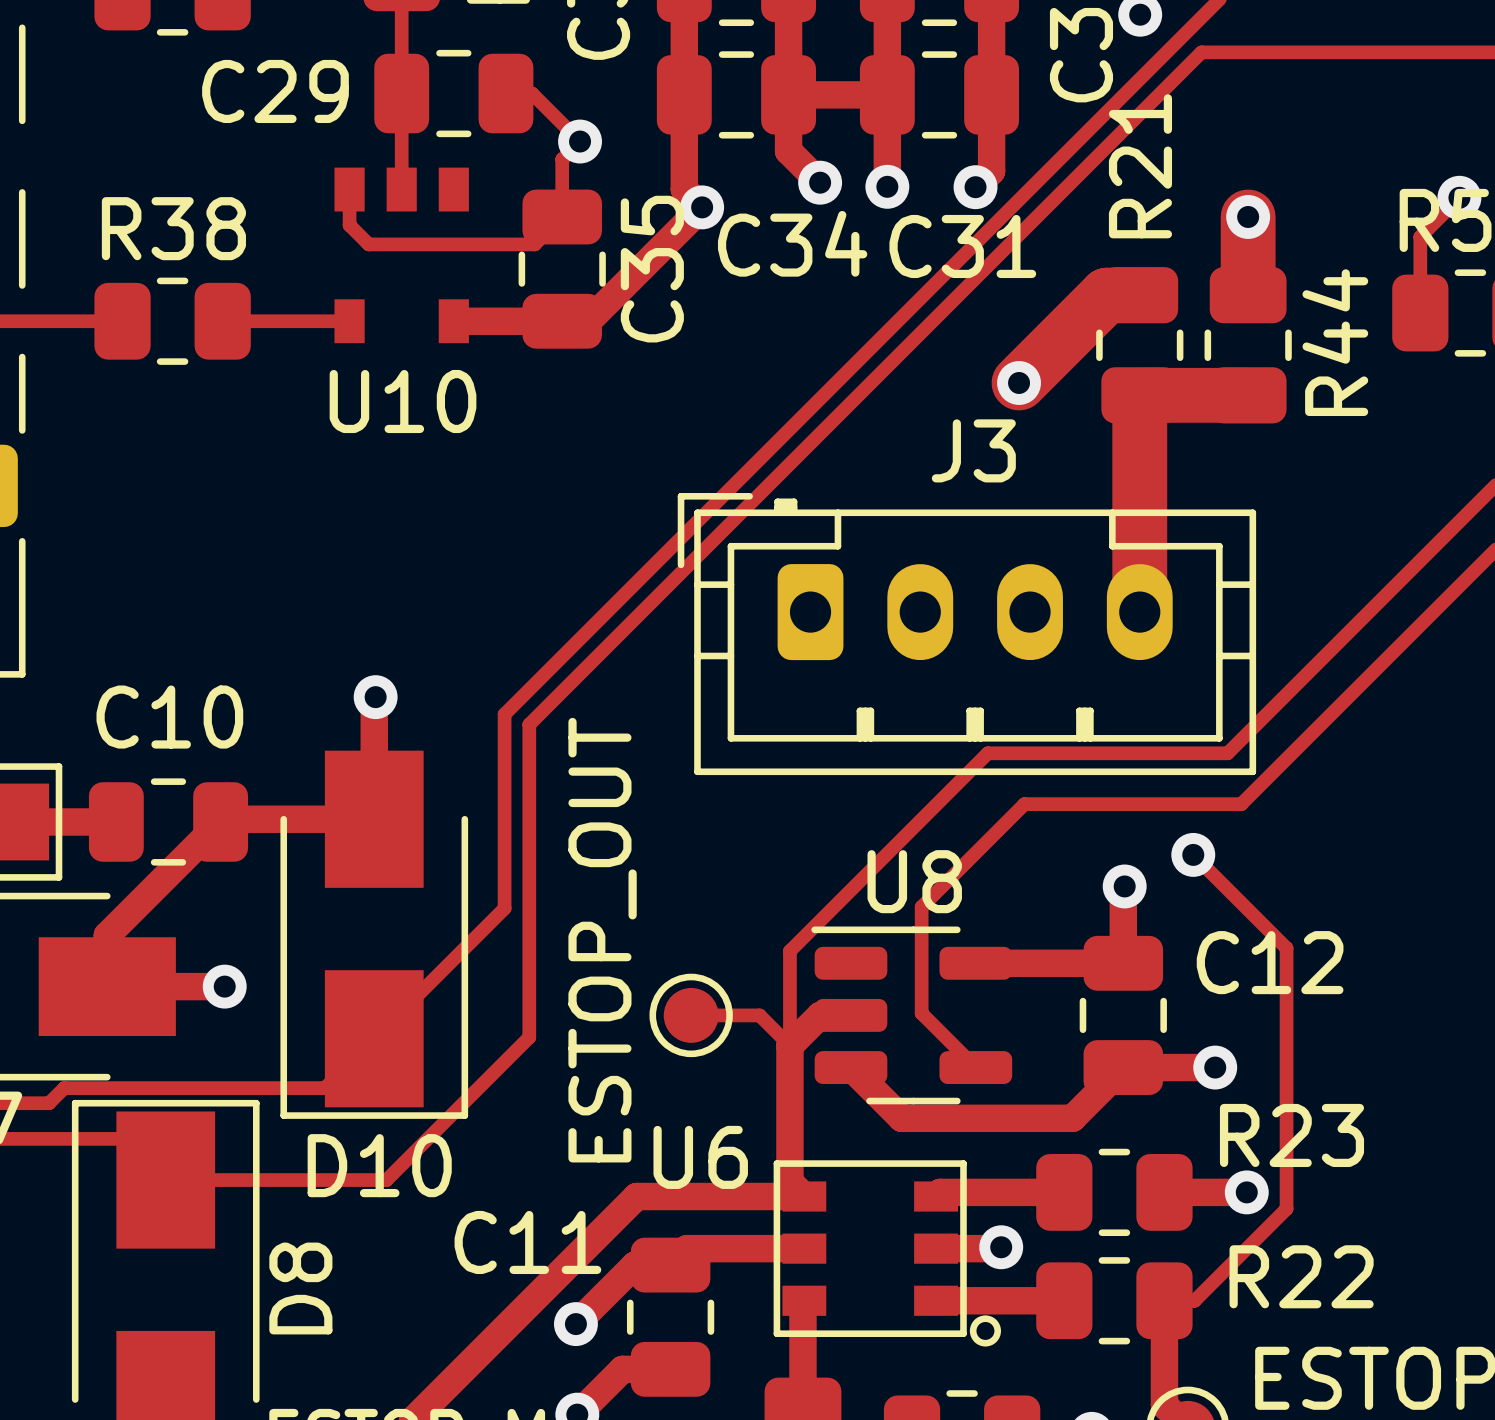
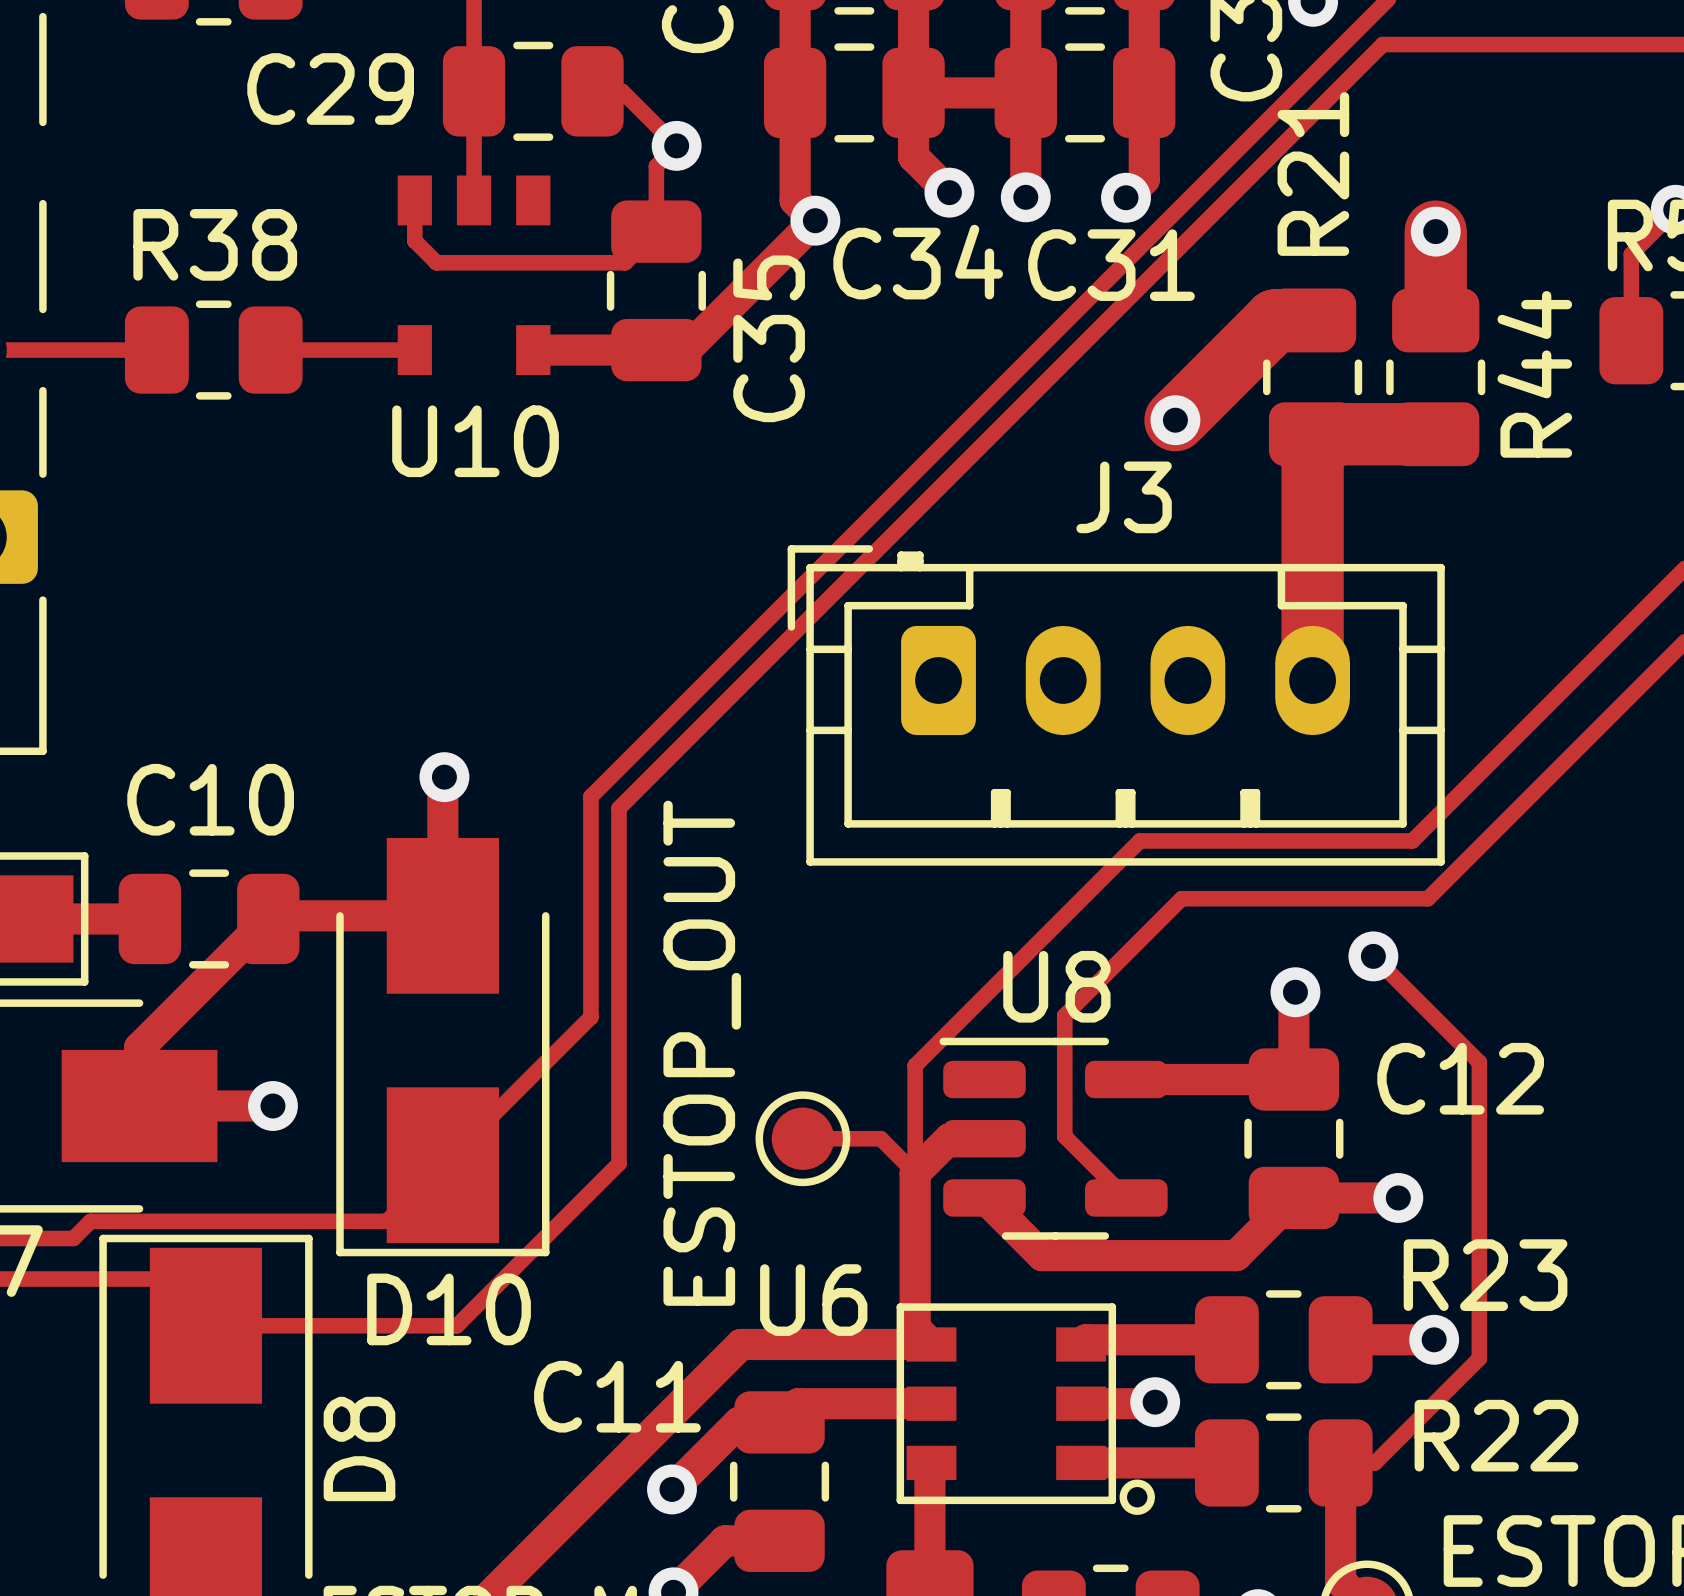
C35 name position: C35 (652, 269) -> C35 (769, 338)

